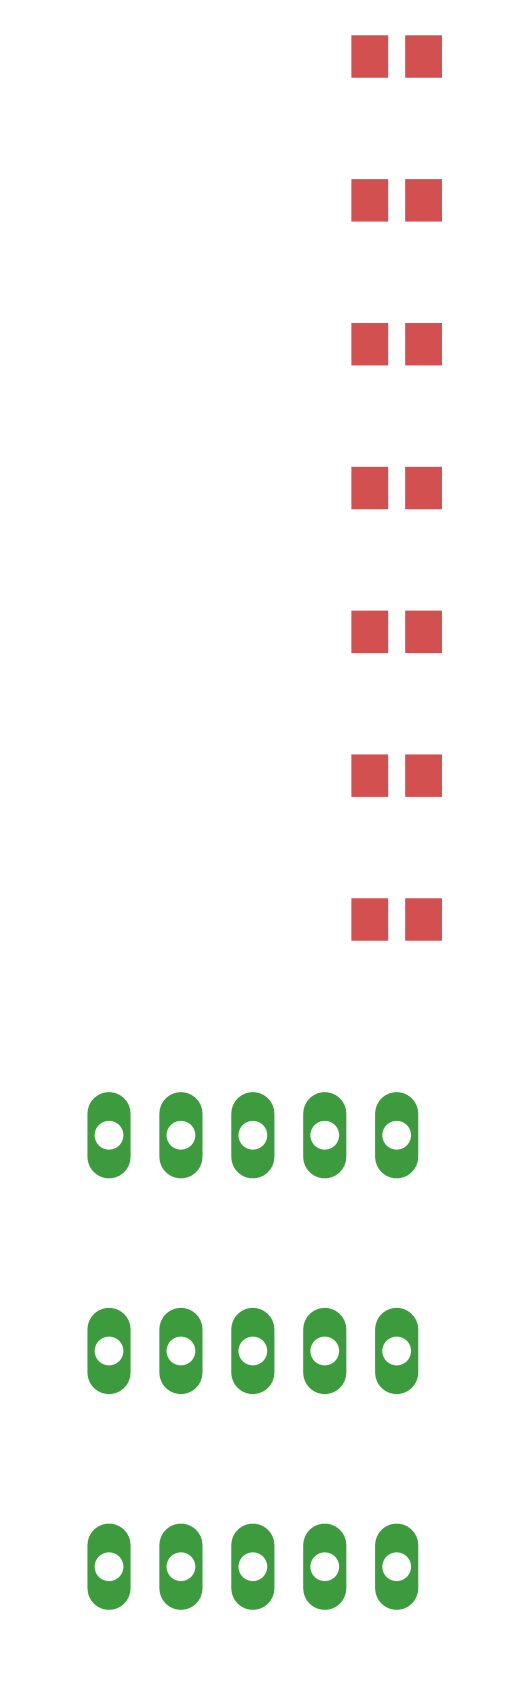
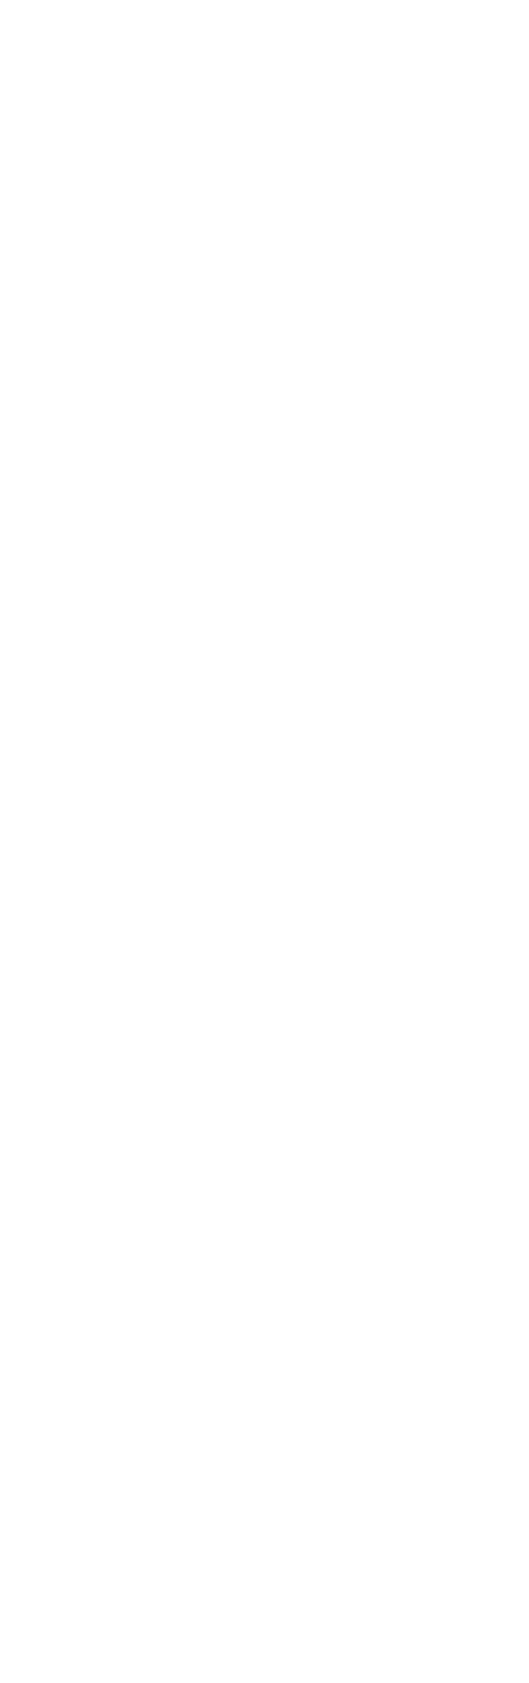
part: (396, 56) -> none
part: (396, 200) -> none
part: (396, 344) -> none
part: (396, 488) -> none
part: (396, 631) -> none
part: (396, 775) -> none
part: (396, 919) -> none
part: (252, 1135) -> none
part: (252, 1350) -> none
part: (252, 1566) -> none

